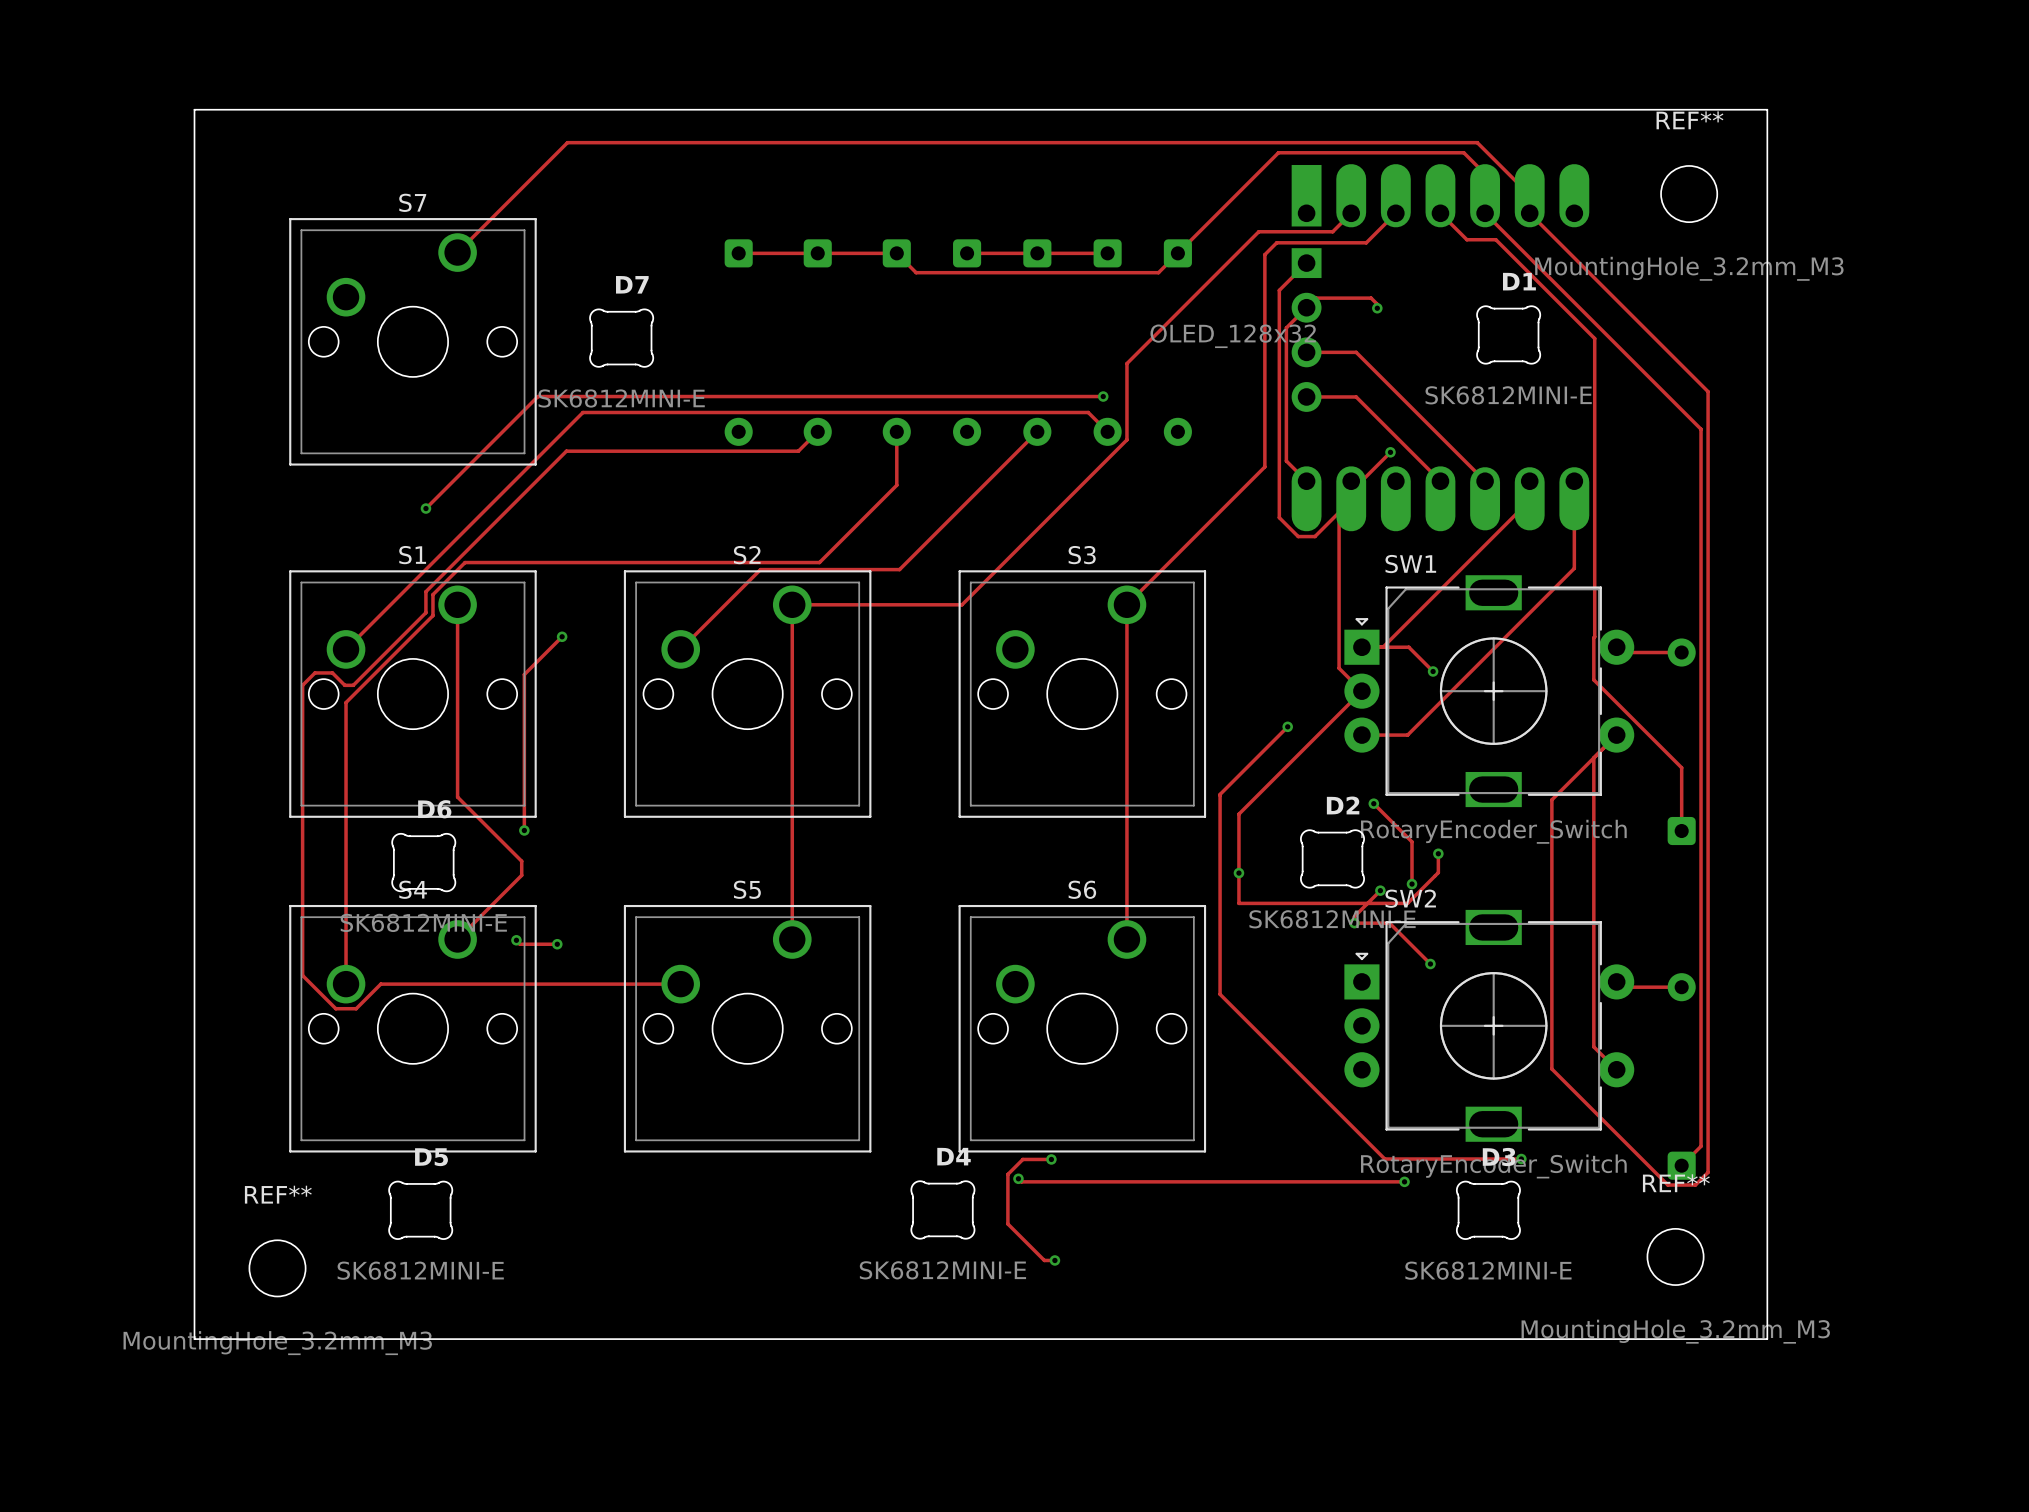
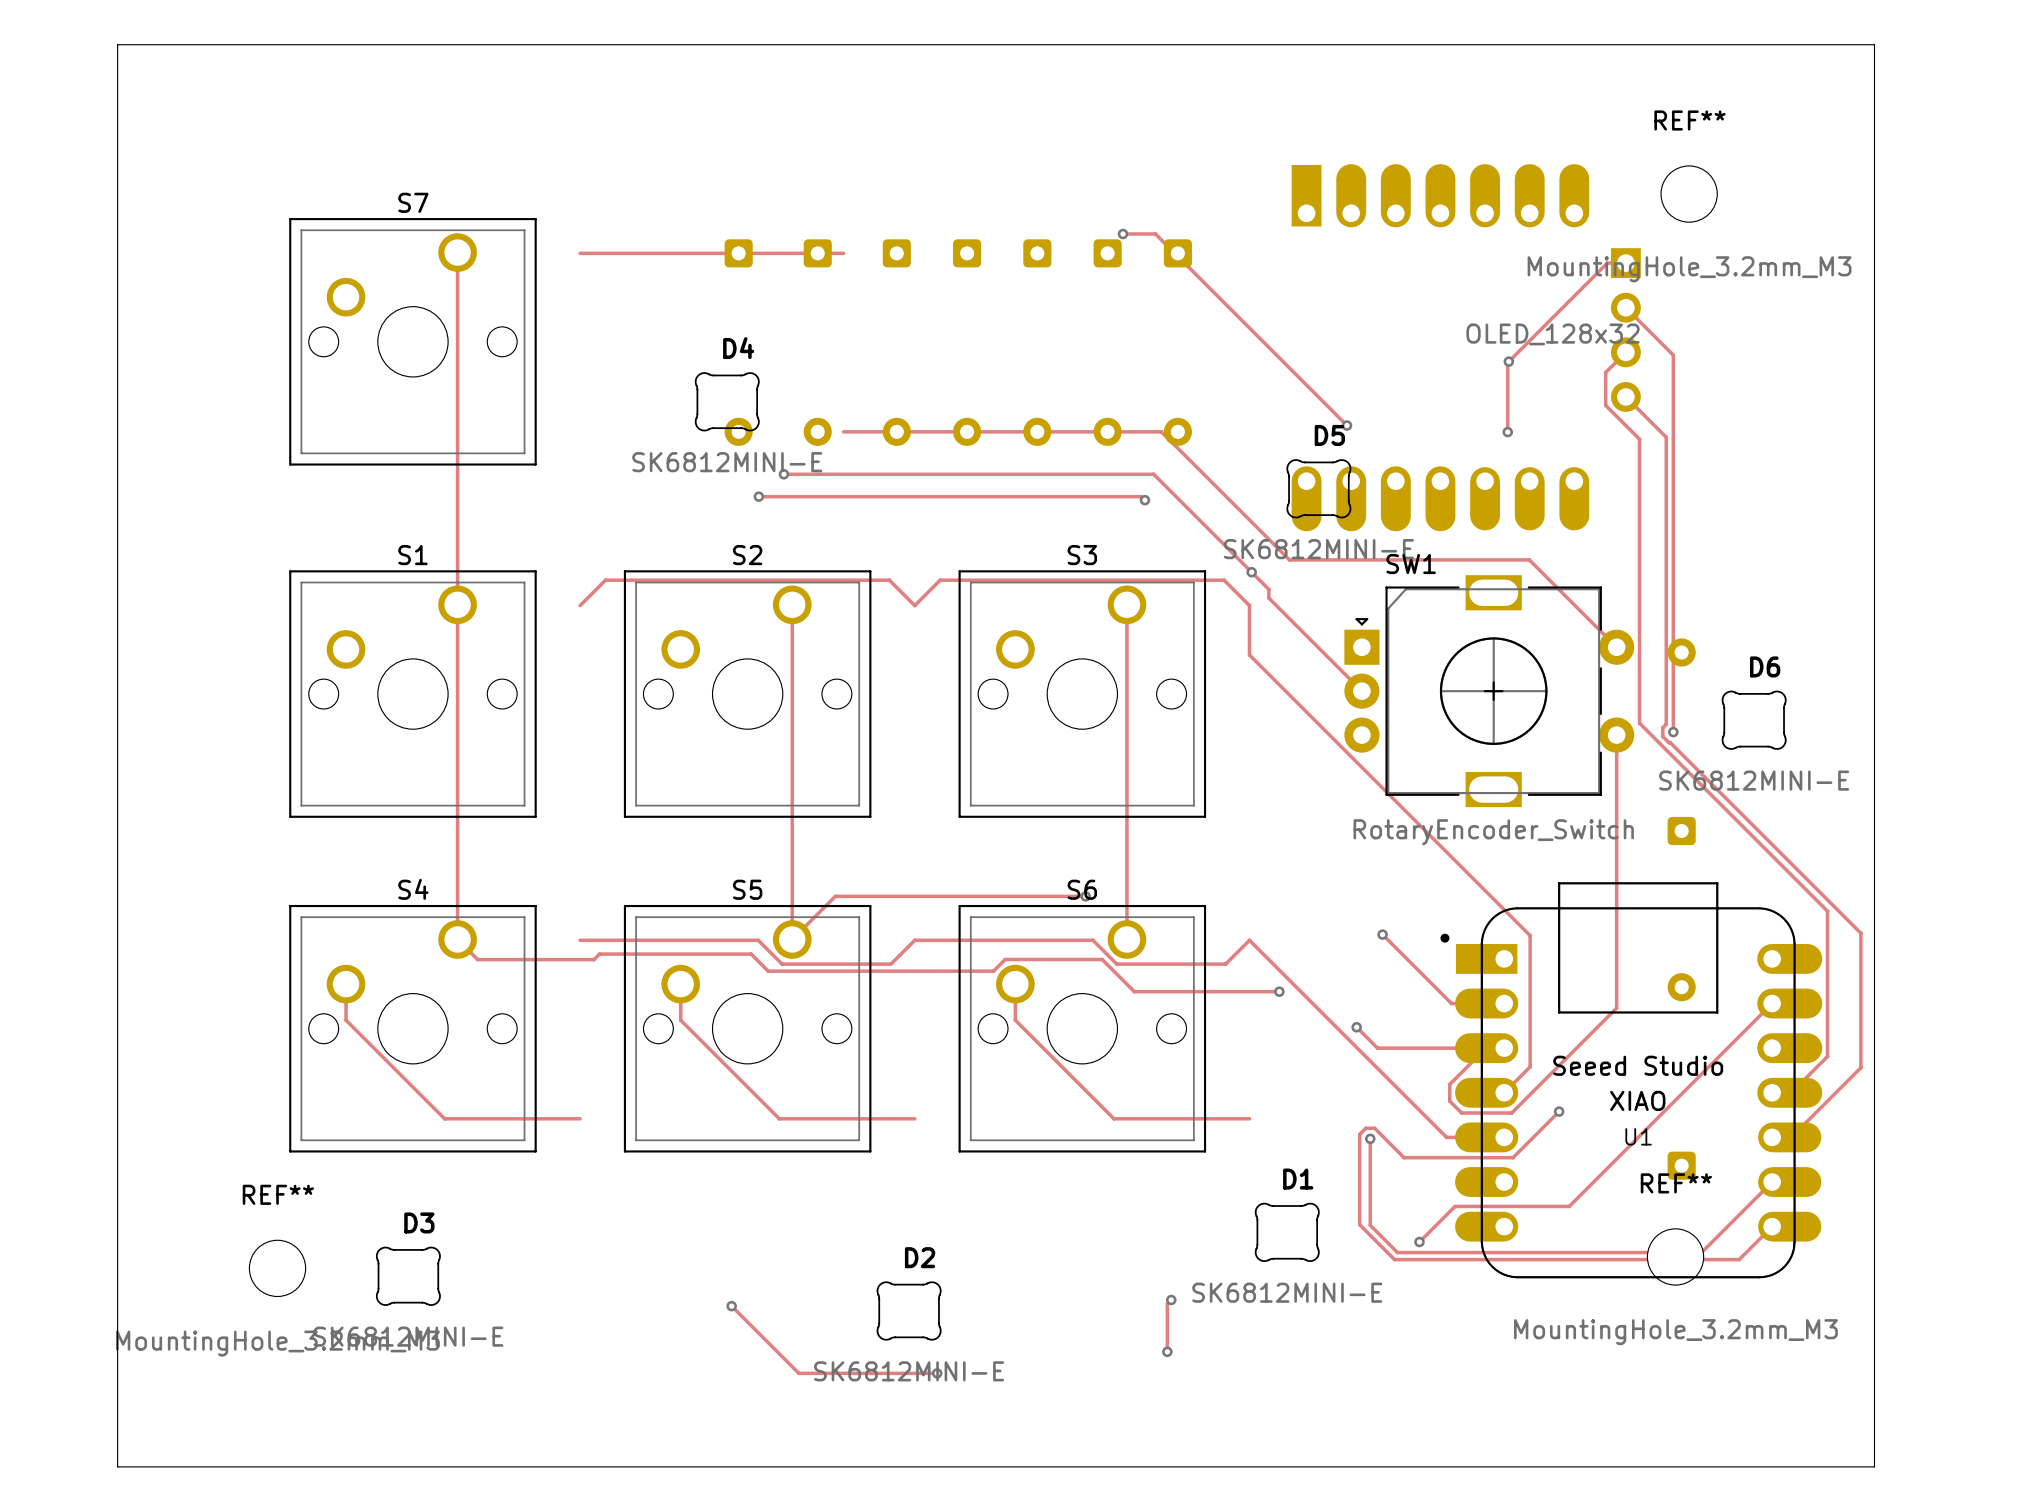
board edge: (194, 109) (1767, 109) (1767, 1339) (194, 1339) (194, 109) -> (117, 44) (117, 1466) (1874, 1466) (1874, 44) (117, 44)
track: (1351, 213) (1332, 231) (1258, 231) (1126, 363) (1126, 439) (962, 604) (792, 604) -> none
track: (1395, 213) (1366, 242) (1276, 242) (1264, 254) (1264, 466) (1126, 604) -> none
track: (1440, 213) (1466, 239) (1495, 239) (1594, 338) (1593, 679) (1681, 767) (1681, 831) -> none
track: none -> (1122, 234) (1155, 234) (1347, 425)
via: none -> (1122, 234)
track: (457, 252) (567, 142) (1477, 142) (1529, 195) (1529, 213) (1708, 391) (1708, 1172) (1695, 1185) (1667, 1185) (1551, 1069) (1551, 799) (1616, 735) -> (457, 252) (457, 604)
track: none -> (580, 253) (738, 253)
track: (843, 253) (896, 253) (916, 272) (1158, 272) (1278, 152) (1463, 152) (1485, 174) (1485, 213) (1701, 429) (1701, 1146) (1681, 1165) -> none
track: (967, 253) (1107, 253) -> none
track: (1306, 263) (1279, 290) (1279, 517) (1298, 536) (1314, 536) (1351, 500) (1351, 481) -> none
track: none -> (1625, 263) (1607, 263) (1507, 362) (1507, 432)
track: none -> (1625, 307) (1673, 355) (1673, 732)
track: (1377, 308) (1377, 304) (1371, 298) (1316, 298) (1286, 327) (1286, 460) (1306, 481) -> none
via: (1377, 308) -> none
part position: (1306, 330) -> (1625, 330)
D1 position: (1508, 334) -> (1287, 1232)
D7: SK6812MINI-E (621, 338) -> none
track: (1306, 352) (1356, 352) (1485, 481) -> none
track: none -> (1625, 352) (1605, 372) (1605, 405) (1639, 439) (1639, 723) (1827, 911) (1827, 1056) (1791, 1092) (1772, 1092)
via: none -> (1508, 361)
track: (1103, 396) (537, 396) (425, 508) -> none
via: (1103, 396) -> none
track: (1306, 396) (1356, 396) (1440, 481) -> none
track: none -> (1625, 396) (1666, 437) (1666, 724) (1662, 727) (1662, 736) (1860, 933) (1860, 1067) (1791, 1137) (1772, 1137)
track: (817, 431) (798, 451) (566, 451) (425, 591) (425, 612) (353, 685) (344, 685) (332, 672) (314, 672) (302, 685) (302, 975) (335, 1008) (356, 1008) (380, 984) (680, 984) -> (914, 1118) (779, 1118) (680, 1020) (680, 984)
track: (896, 431) (896, 485) (819, 562) (465, 562) (432, 594) (432, 615) (346, 702) (346, 984) -> (580, 1118) (444, 1118) (346, 1020) (346, 984)
track: (1037, 431) (899, 569) (760, 569) (680, 649) -> none
track: (1107, 431) (1088, 412) (582, 412) (346, 649) -> none
via: none -> (1507, 432)
track: (1390, 452) (1361, 481) (1351, 481) -> none
via position: (1390, 452) -> (1347, 425)
via: none -> (783, 474)
track: (1351, 481) (1339, 493) (1339, 668) -> (783, 474) (1153, 474) (1268, 589) (1268, 598) (1339, 668)
track: (1529, 481) (1529, 500) (1383, 647) -> none
track: (1574, 481) (1574, 568) (1407, 735) (1361, 735) -> none
track: none -> (758, 496) (1141, 496) (1144, 500)
via: none -> (758, 496)
via: none -> (1144, 500)
via: (425, 508) -> none
via: none -> (1251, 572)
track: none -> (580, 605) (605, 580) (889, 580) (914, 605) (940, 580) (1224, 580) (1249, 605) (1249, 654) (1530, 935) (1530, 1066) (1504, 1092)
track: (562, 636) (524, 674) (524, 829) -> none
via: (562, 636) -> none
track: (1361, 647) (1408, 647) (1433, 671) -> none
track: (1616, 647) (1621, 652) (1681, 652) -> (1616, 647) (1529, 559) (1289, 559) (1161, 431) (843, 431)
via: (1433, 671) -> none
track: (1361, 691) (1238, 814) (1238, 903) (1407, 903) (1438, 872) (1438, 852) -> none
track: (1287, 726) (1220, 794) (1220, 994) (1384, 1159) (1521, 1159) -> none
via: (1287, 726) -> none
via: none -> (1673, 732)
track: none -> (1616, 735) (1616, 1008) (1511, 1113) (1461, 1113) (1449, 1101) (1449, 1084) (1486, 1048)
track: (1593, 757) (1593, 1046) (1616, 1069) -> none
track: (457, 797) (521, 861) (521, 875) (457, 939) -> (457, 797) (457, 939) (477, 959) (593, 959) (599, 954) (751, 954) (768, 971) (993, 971) (1005, 959) (1102, 959) (1134, 991) (1279, 991)
track: (1373, 803) (1412, 841) (1412, 884) -> none
via: (1373, 803) -> none
via: (524, 830) -> none
via: (1438, 853) -> none
D2 position: (1332, 858) -> (909, 1310)
D6 position: (423, 862) -> (1754, 720)
via: (1238, 873) -> none
via: (1412, 884) -> none
track: (1380, 890) (1354, 916) (1354, 923) -> none
via: (1380, 890) -> none
track: none -> (1085, 896) (835, 896) (792, 939)
via: none -> (1085, 896)
track: (1352, 923) (1389, 923) (1430, 964) -> none
via: (1354, 923) -> none
track: none -> (1382, 934) (1451, 1003) (1504, 1003)
via: none -> (1382, 934)
track: (516, 940) (519, 944) (557, 944) -> none
via: (516, 940) -> none
track: none -> (580, 940) (758, 940) (782, 964) (890, 964) (914, 940) (1092, 940) (1116, 964) (1225, 964) (1249, 940) (1446, 1137) (1504, 1137)
via: (557, 944) -> none
via: (1430, 964) -> none
track: (1616, 981) (1621, 987) (1681, 987) -> none
track: none -> (1015, 984) (1015, 1020) (1113, 1118) (1249, 1118)
via: none -> (1279, 991)
track: none -> (1772, 1003) (1569, 1206) (1455, 1206) (1419, 1242)
SW2: RotaryEncoder_Switch (1489, 1025) -> none
track: none -> (1356, 1027) (1377, 1048) (1504, 1048)
via: none -> (1356, 1027)
U1: none -> (1631, 1080)
track: none -> (1559, 1111) (1513, 1157) (1404, 1157) (1374, 1128) (1365, 1128) (1359, 1134) (1359, 1224) (1394, 1259) (1739, 1259) (1772, 1226)
track: none -> (1370, 1138) (1370, 1225) (1397, 1252) (1701, 1252) (1772, 1182)
via: none -> (1370, 1138)
track: (1051, 1159) (1022, 1159) (1007, 1174) (1007, 1224) (1044, 1260) (1054, 1260) -> none
via: (1051, 1159) -> none
via position: (1521, 1159) -> (1559, 1111)
track: (1018, 1178) (1021, 1181) (1404, 1181) -> none
via: (1018, 1178) -> none
via: (1404, 1181) -> none
D4 position: (942, 1209) -> (727, 401)
D5 position: (420, 1210) -> (1318, 488)
D3 position: (1488, 1210) -> (408, 1276)
via: none -> (1419, 1242)
via: (1054, 1260) -> none
track: none -> (1171, 1300) (1167, 1303) (1167, 1351)
via: none -> (1171, 1300)
track: none -> (731, 1306) (798, 1373) (937, 1373)
via: none -> (731, 1306)
via: none -> (1167, 1351)
via: none -> (937, 1373)

